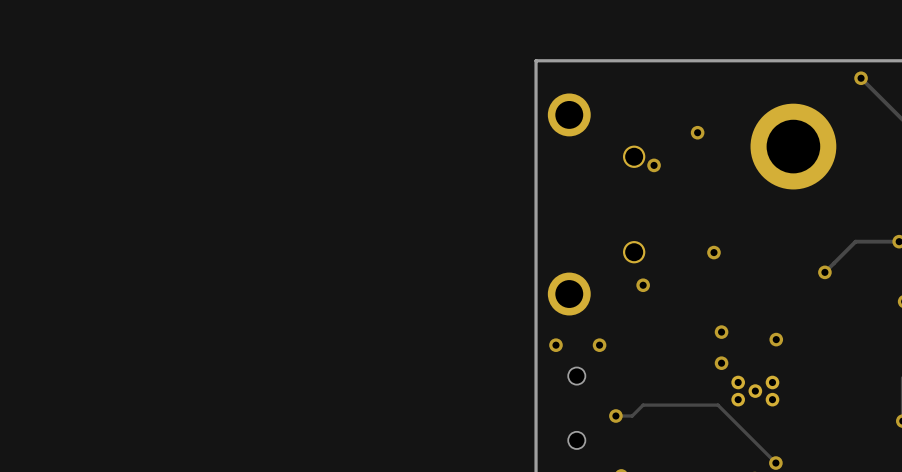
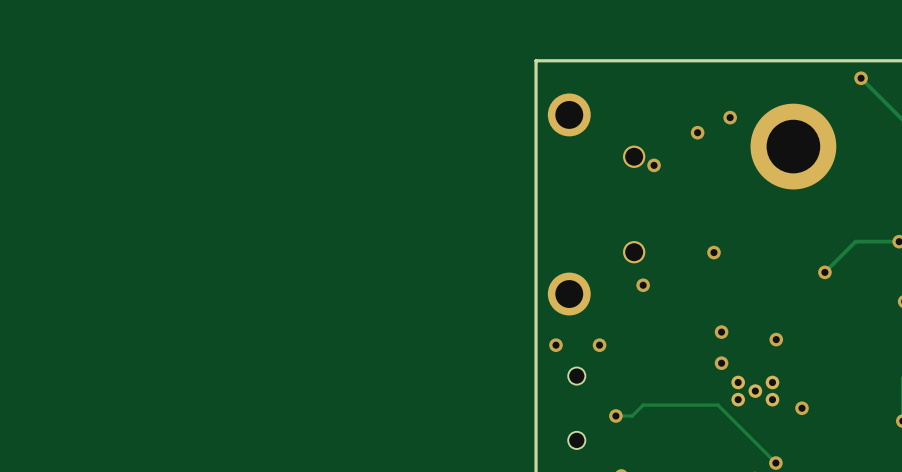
via: none -> (730, 117)
via: none -> (801, 408)

